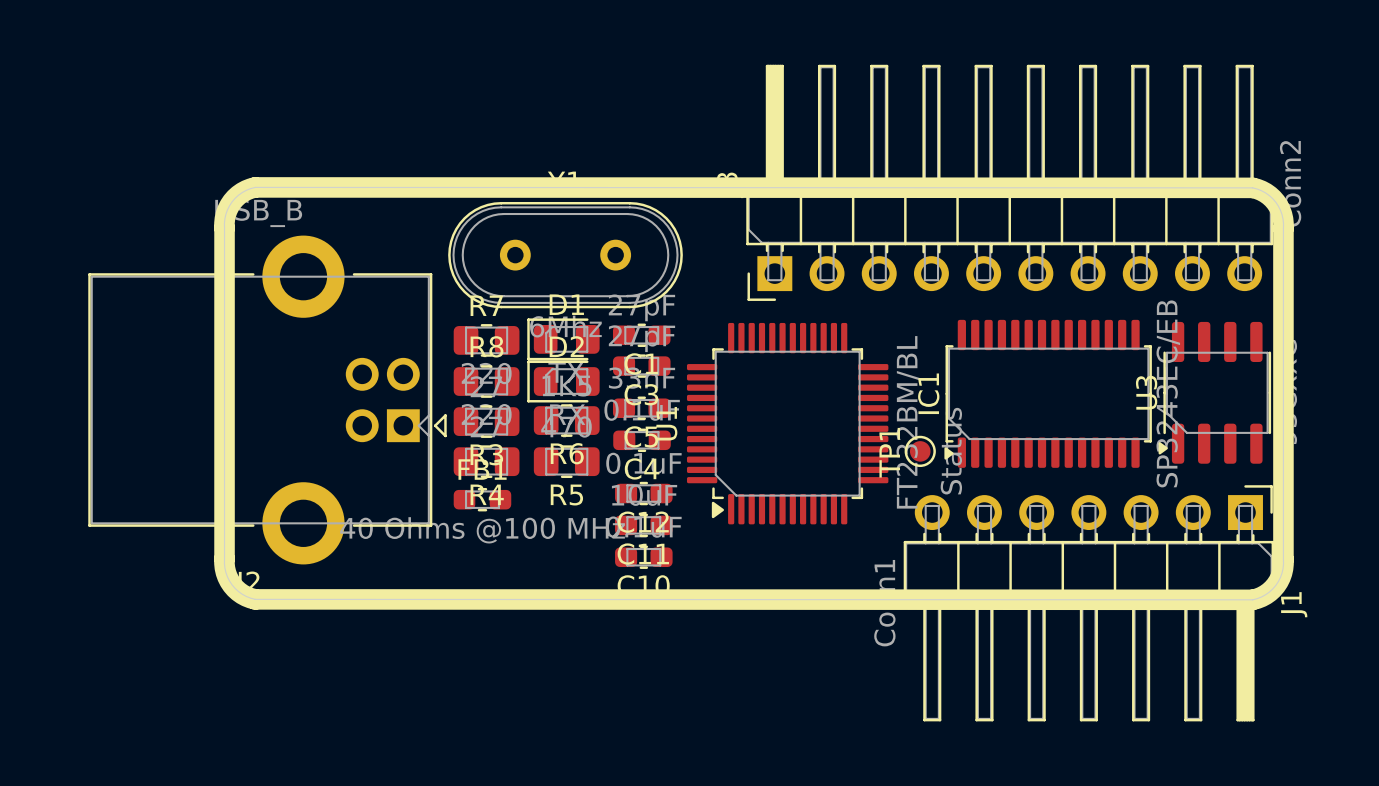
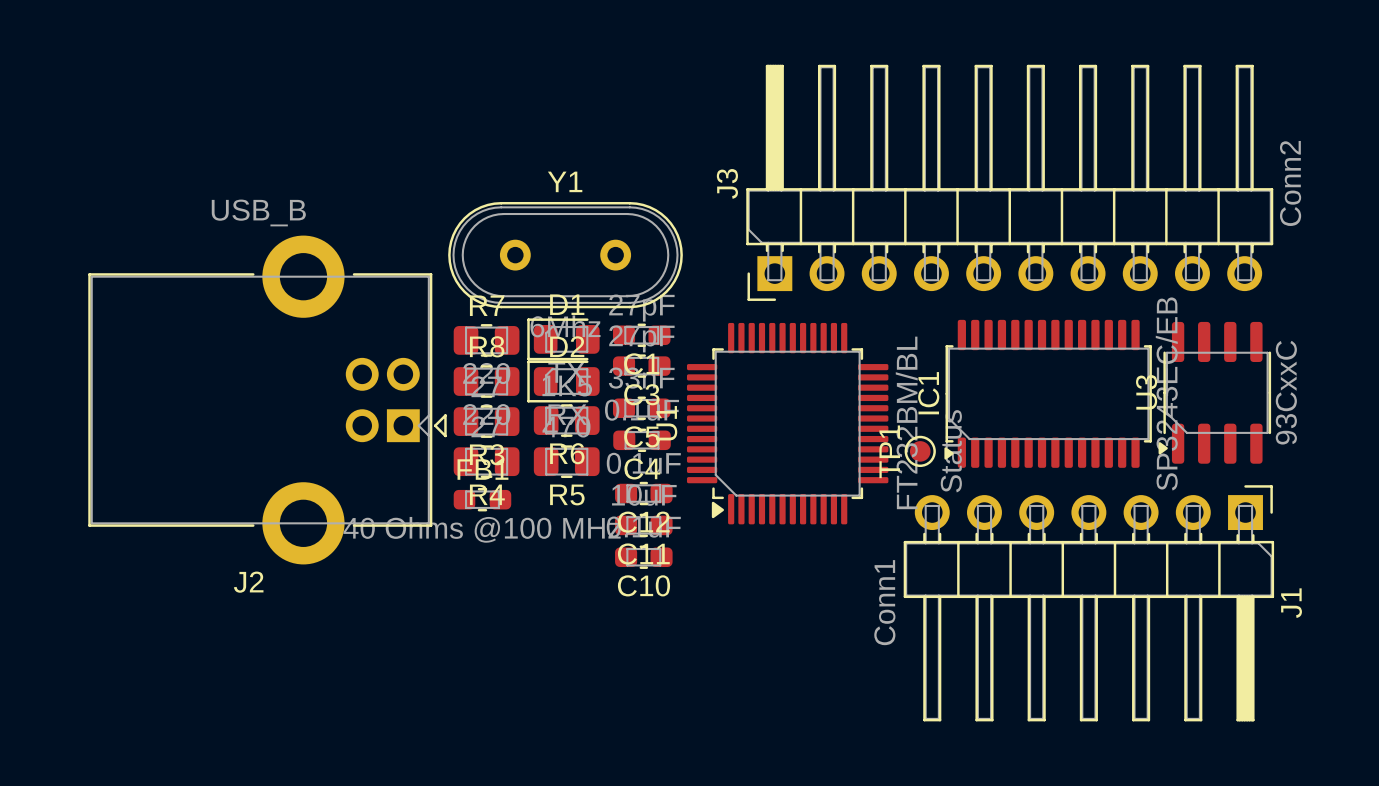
line: (255, 187) (1257, 189) (1265, 192) (1275, 202) (1280, 210) (1283, 223) (1283, 563) (1280, 577) (1269, 592) (1252, 599) (250, 598) (238, 591) (232, 584) (227, 576) (224, 563) (224, 223) (227, 209) (235, 198) (246, 190) (255, 187) -> none
board edge: (255, 187) (1257, 189) (1269, 195) (1275, 202) (1282, 214) (1283, 223) (1283, 563) (1280, 577) (1269, 592) (1252, 599) (250, 598) (238, 591) (232, 584) (227, 576) (224, 563) (224, 223) (227, 209) (235, 198) (246, 190) (255, 187) -> none

